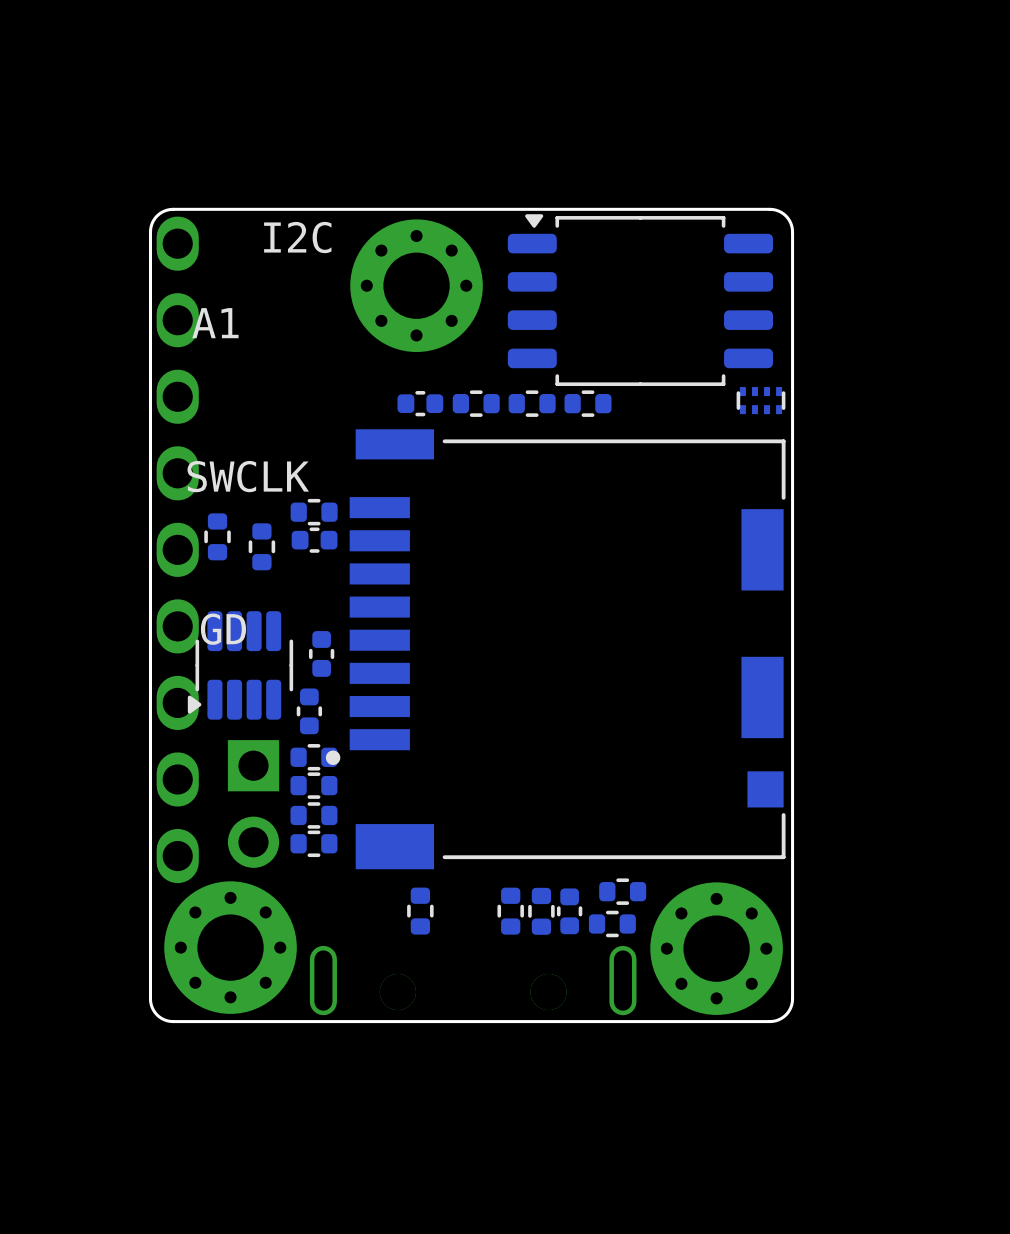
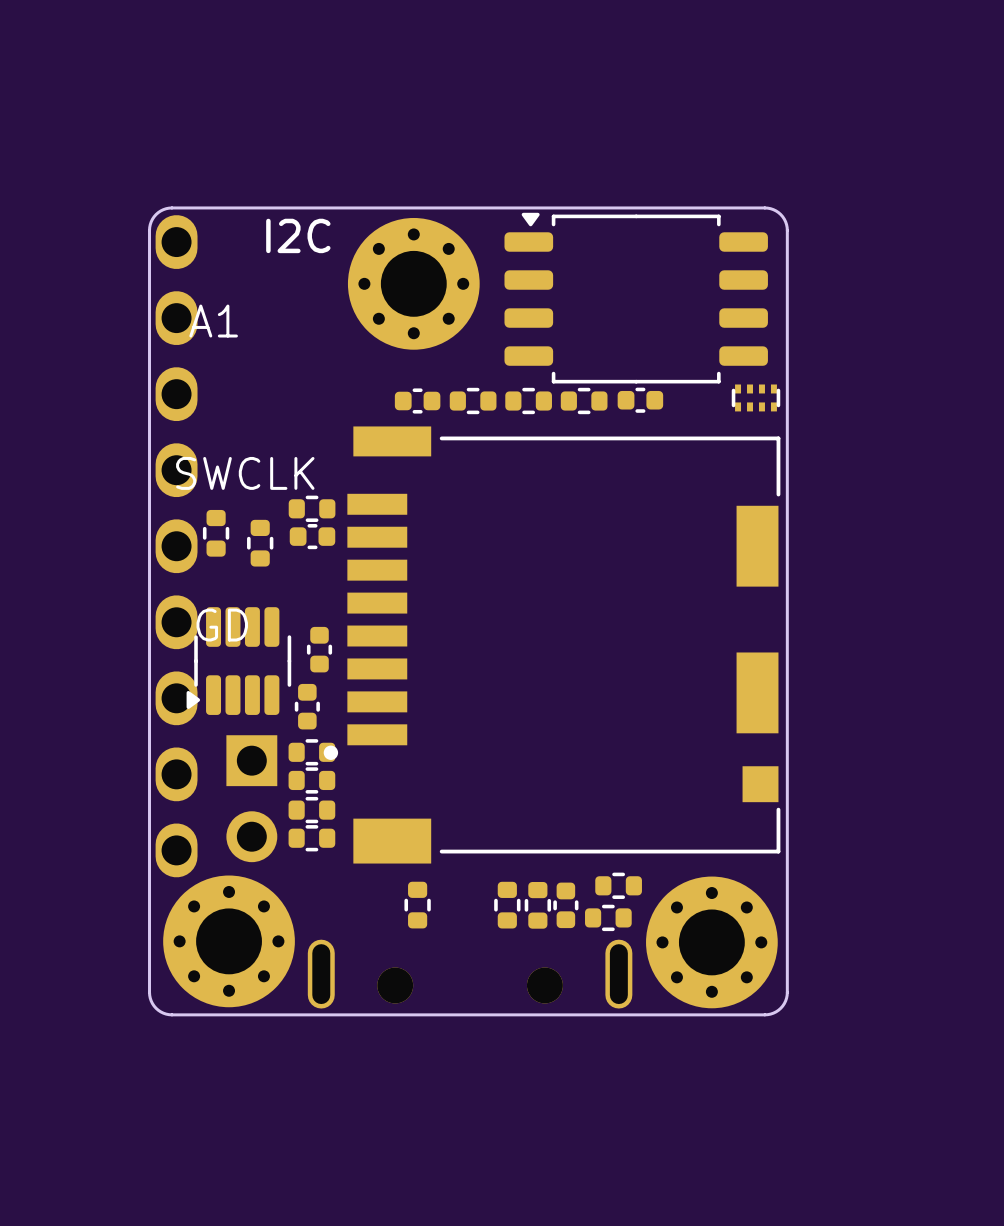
part: none -> (640, 400)

